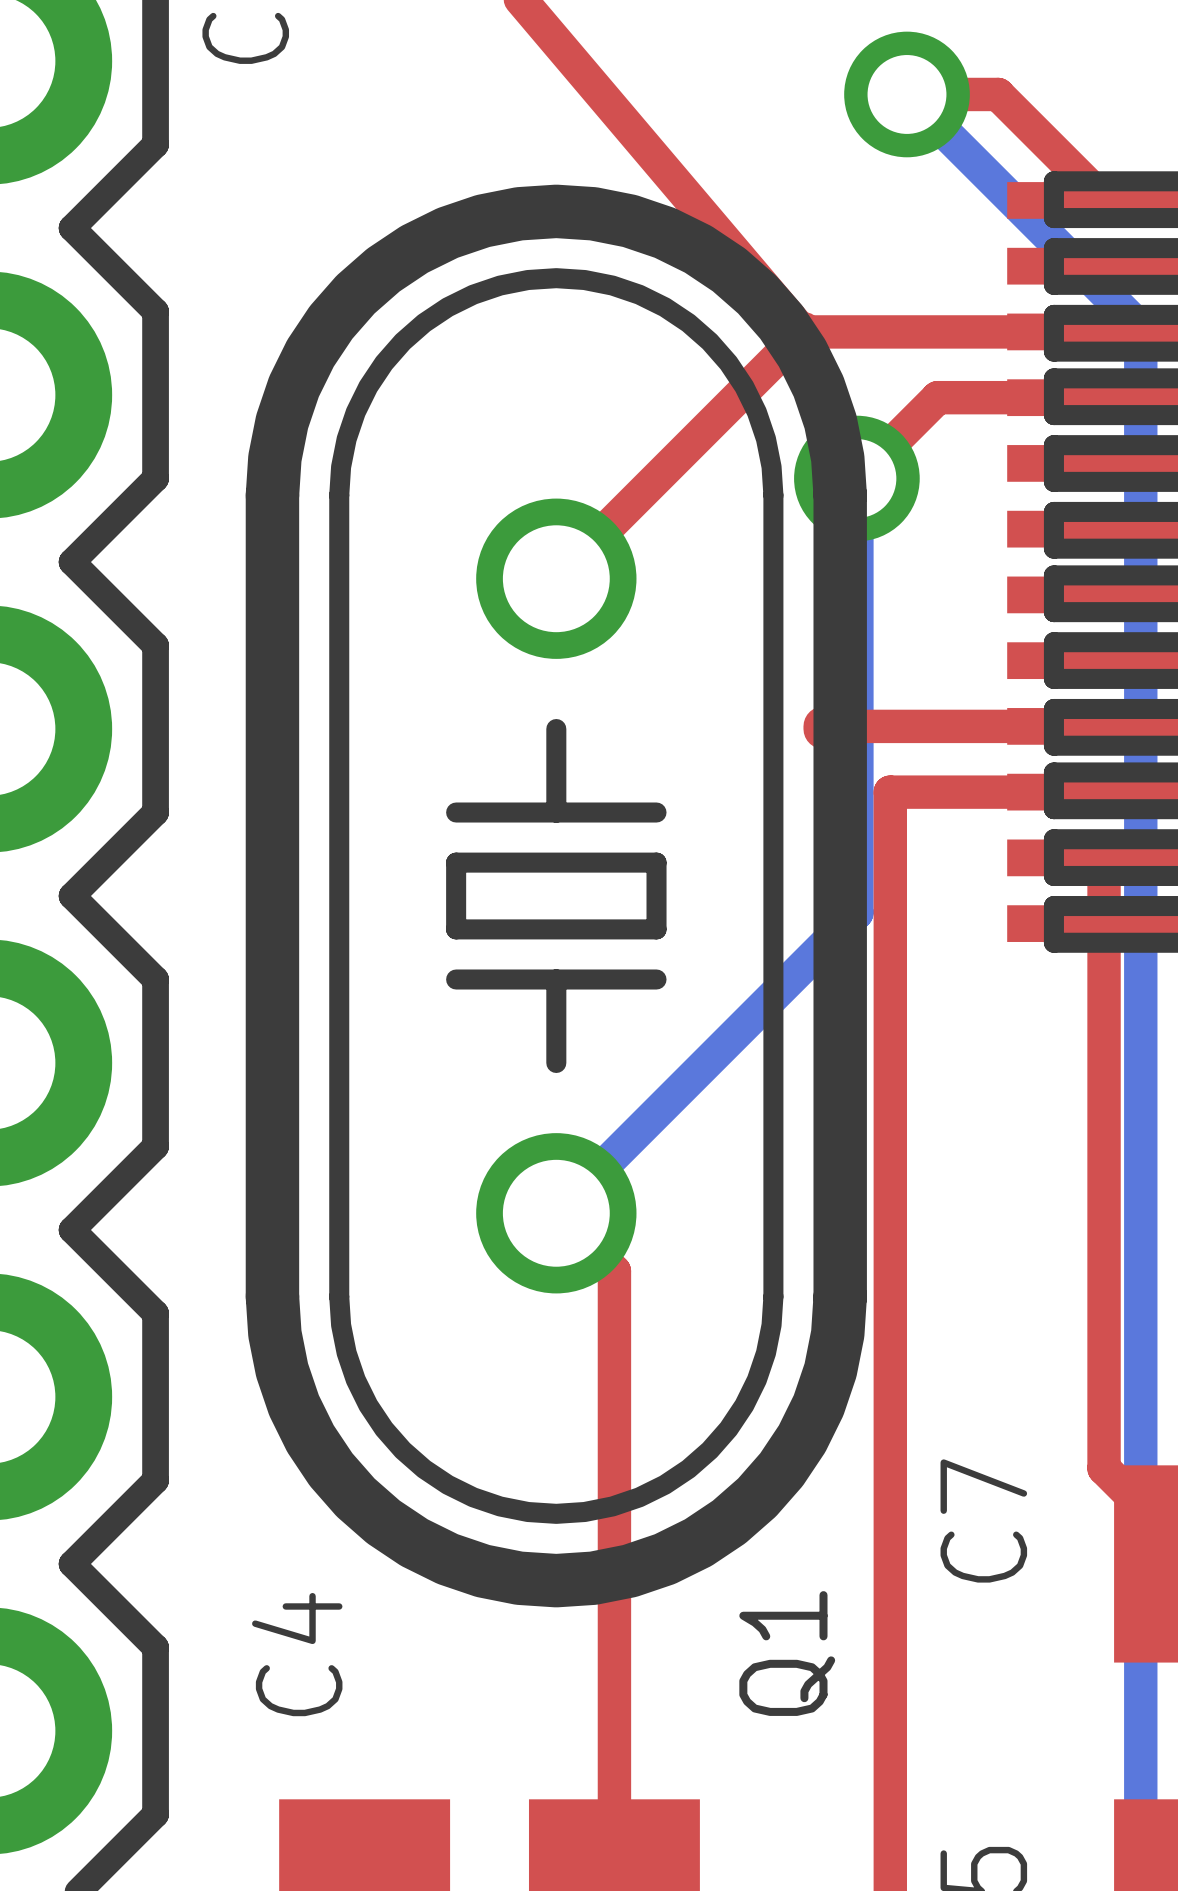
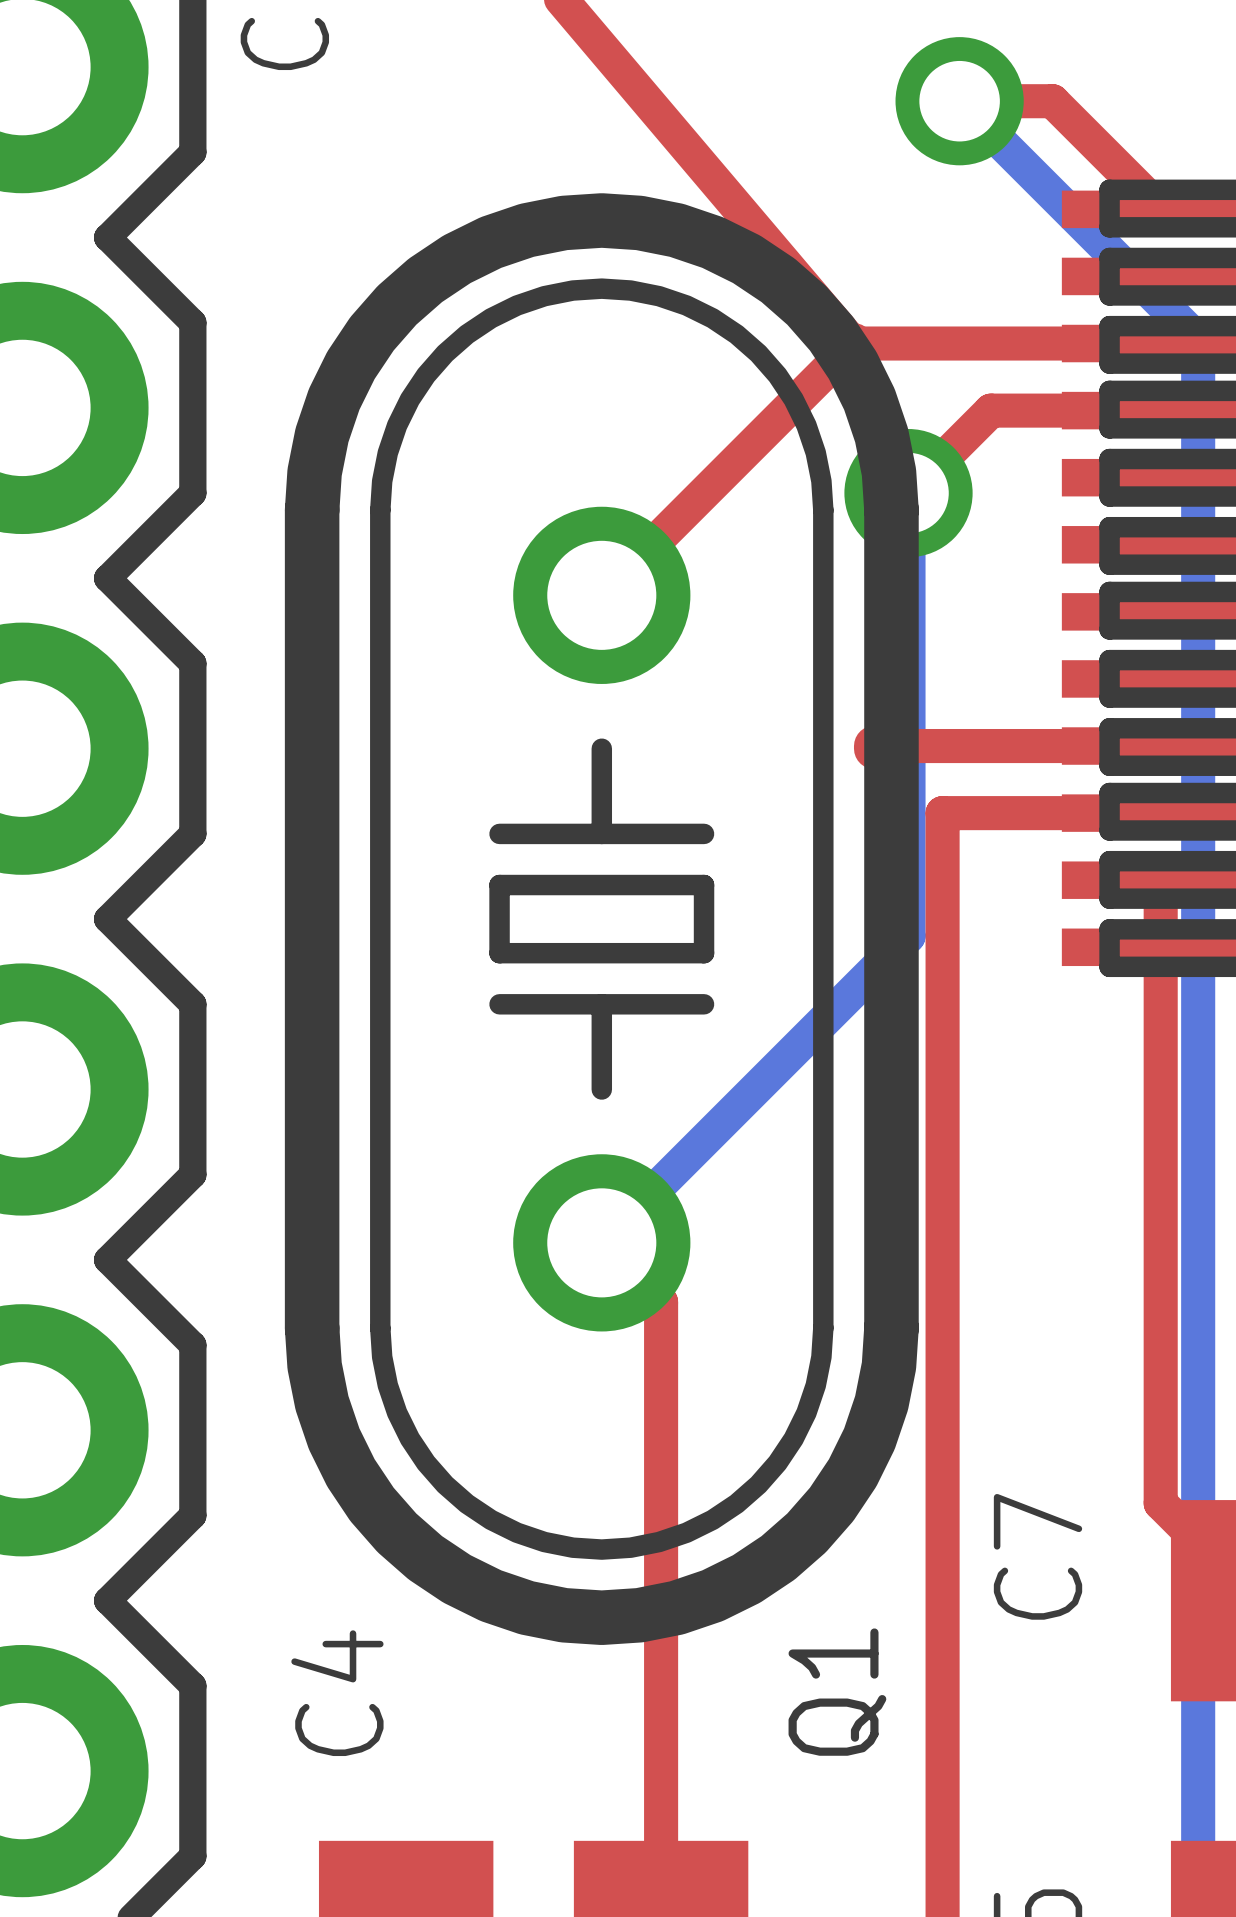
Q1 footprint: [245, 184, 867, 1608] -> [284, 193, 919, 1645]

